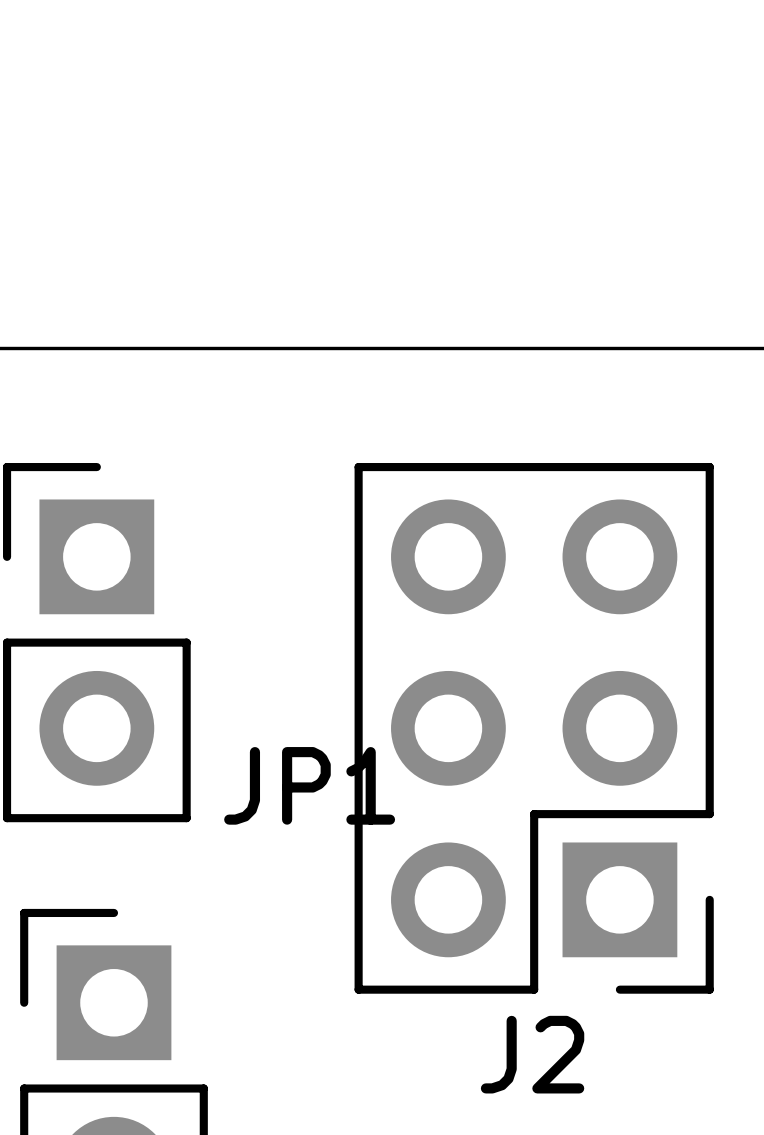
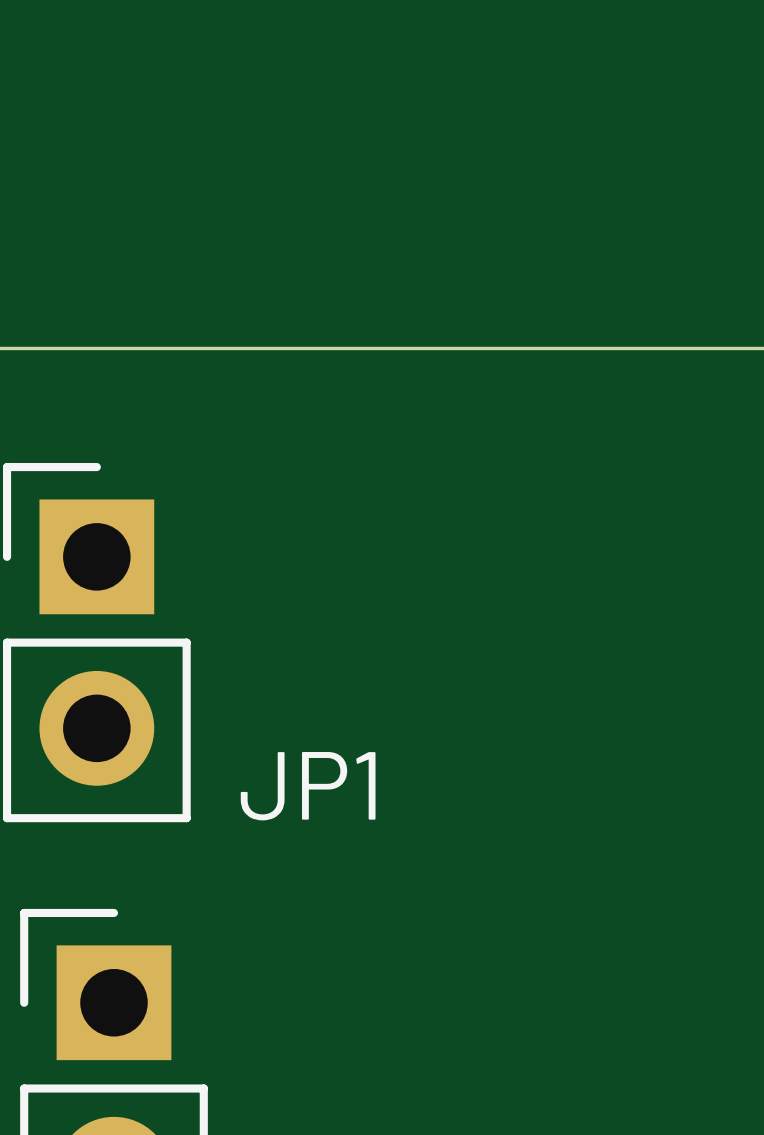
J2: (534, 728) -> none

